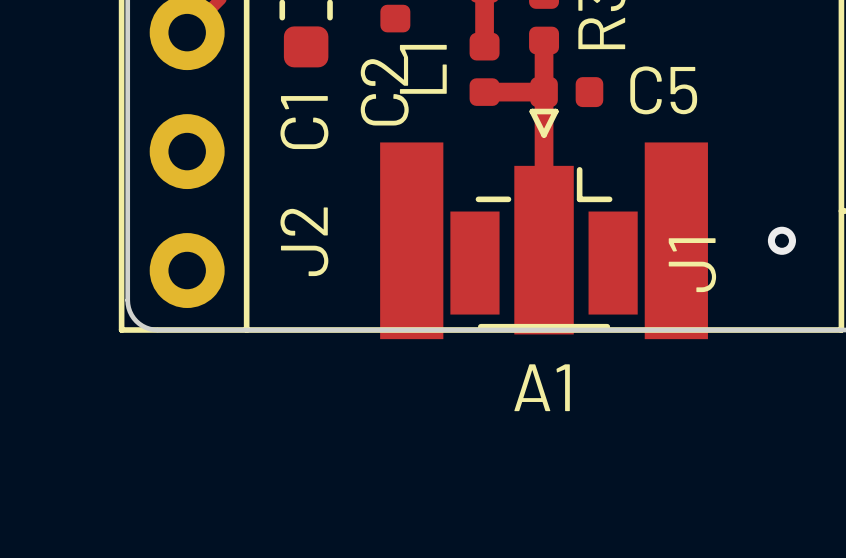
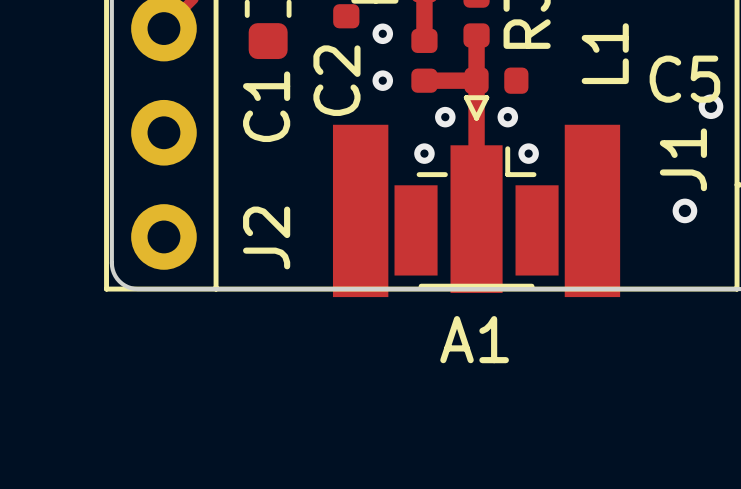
via: none -> (382, 33)
L1 name position: L1 (423, 69) -> L1 (605, 53)
C5 name position: C5 (663, 90) -> C5 (684, 79)
via: none -> (382, 80)
via: none -> (710, 106)
via: none -> (445, 117)
via: none -> (507, 117)
via: none -> (424, 153)
via: none -> (528, 153)
J2 name position: J2 (304, 241) -> J2 (266, 237)
J1 name position: J1 (692, 265) -> J1 (683, 159)

